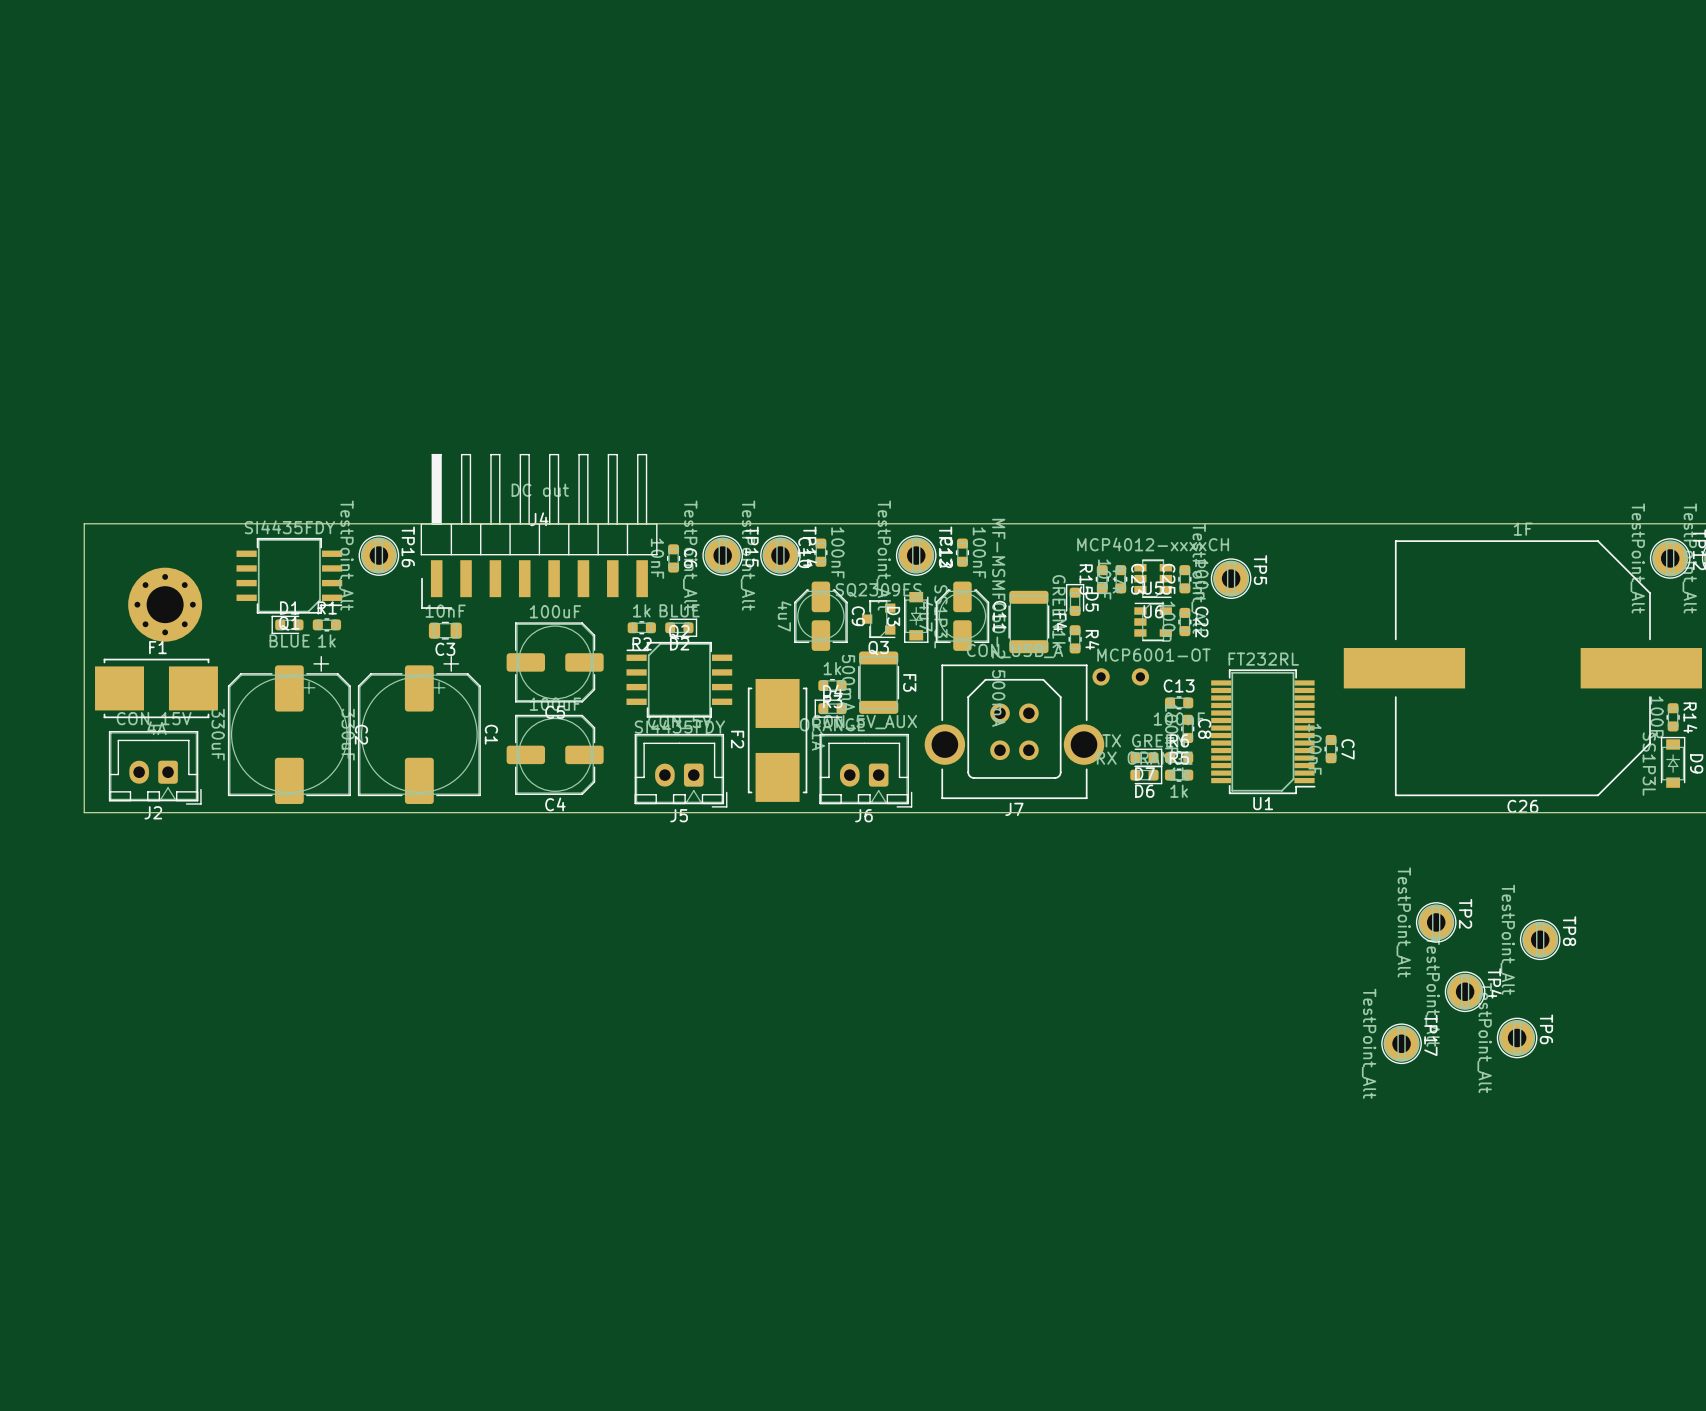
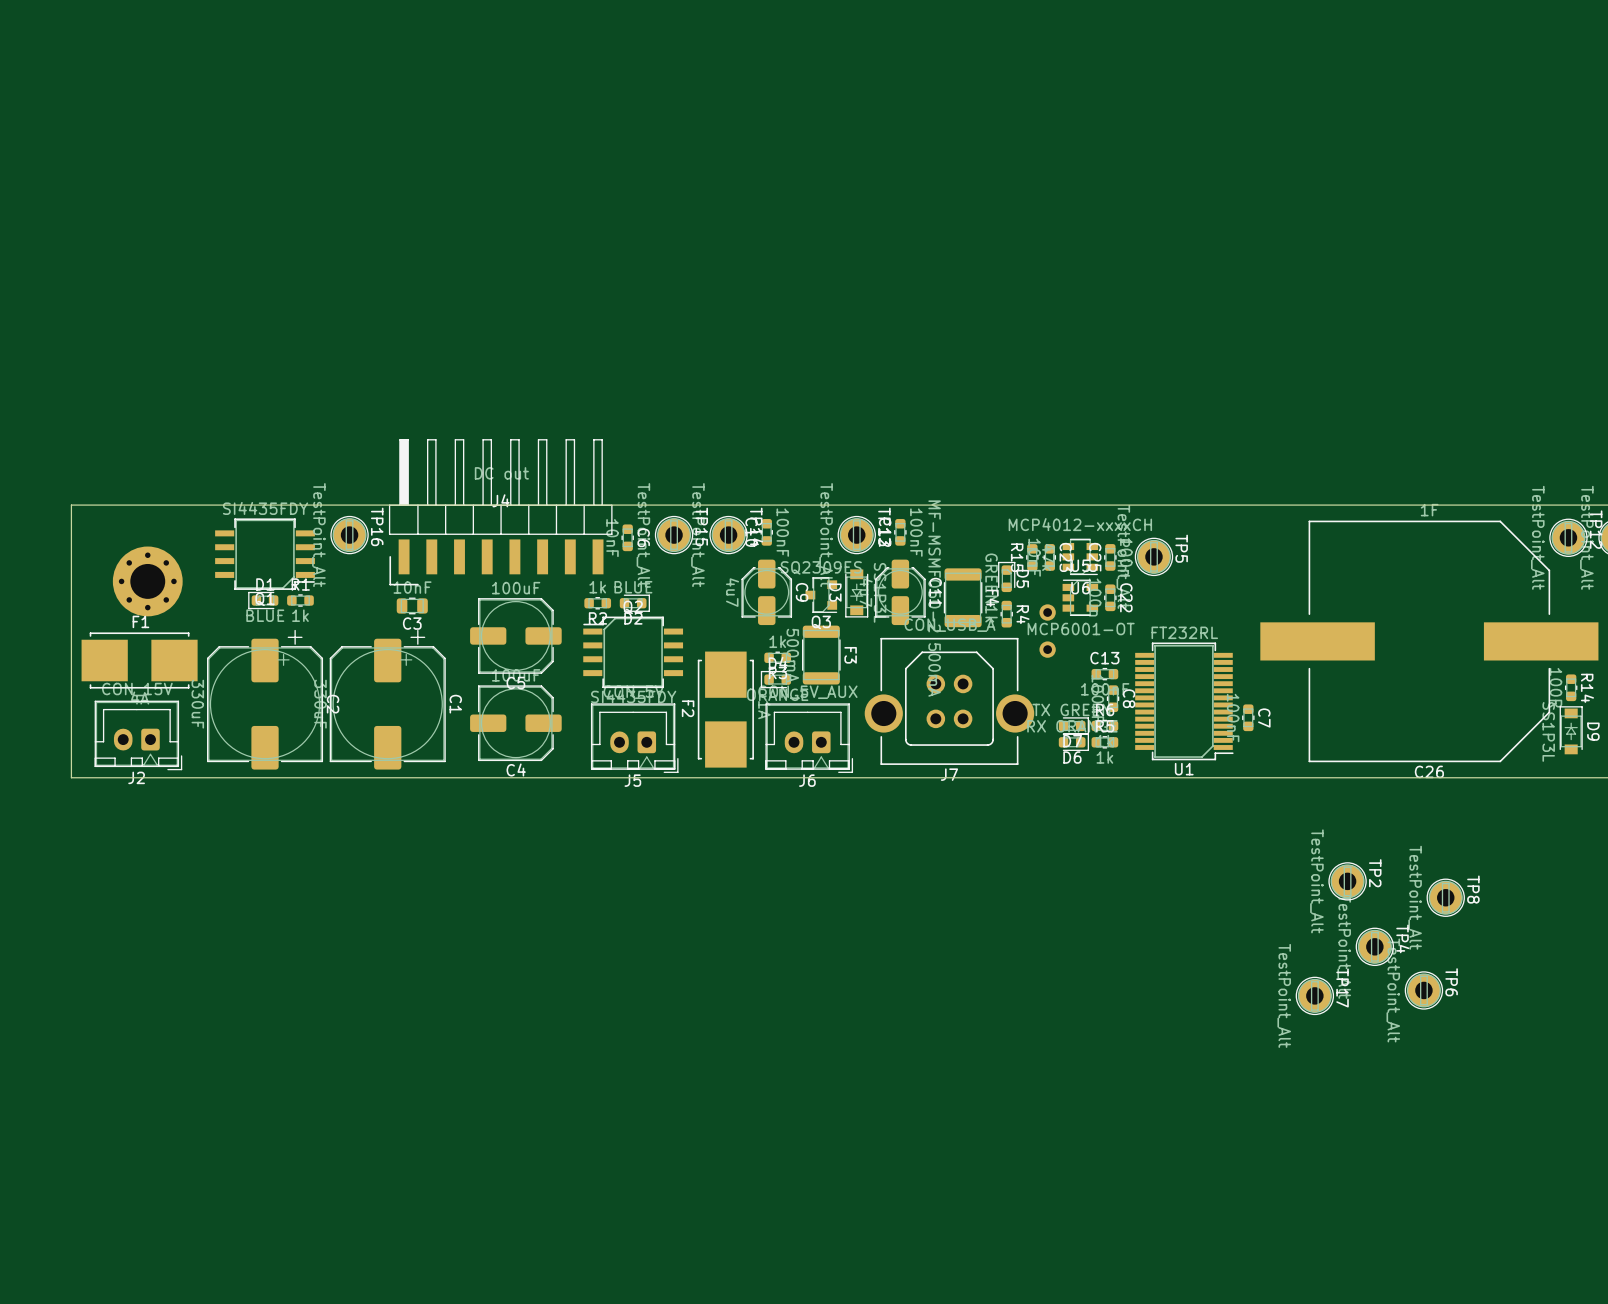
part rotation: 0° (1120, 676) -> 90° clockwise (1047, 631)

